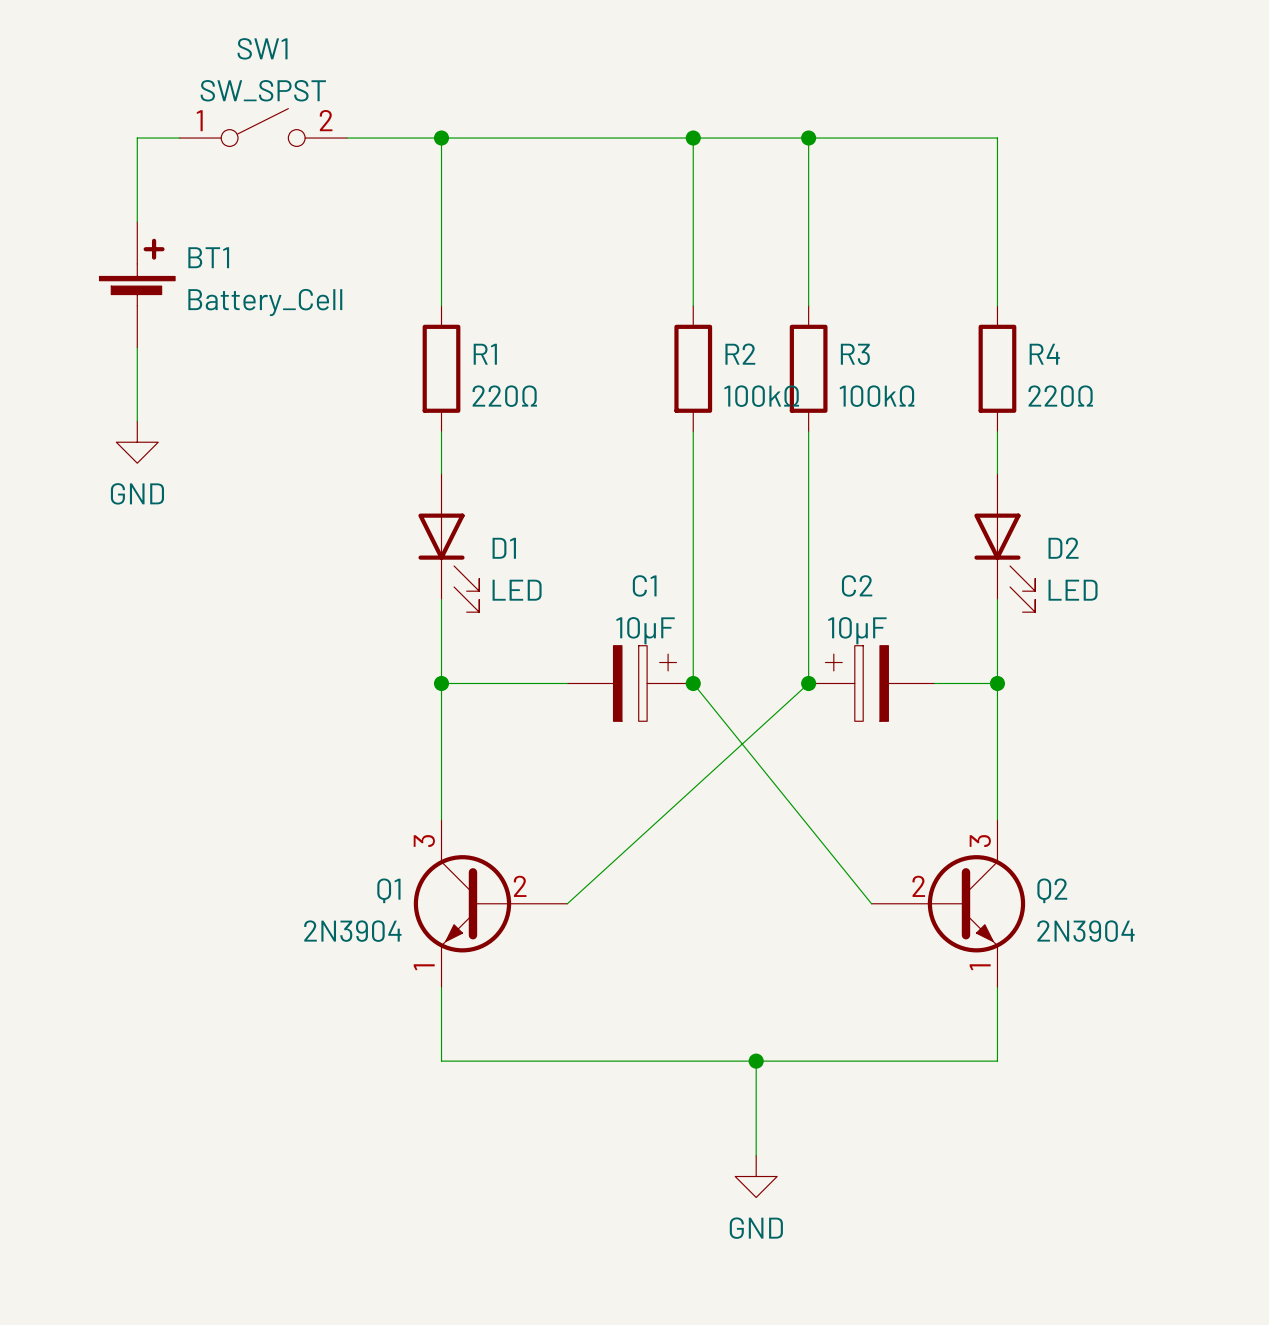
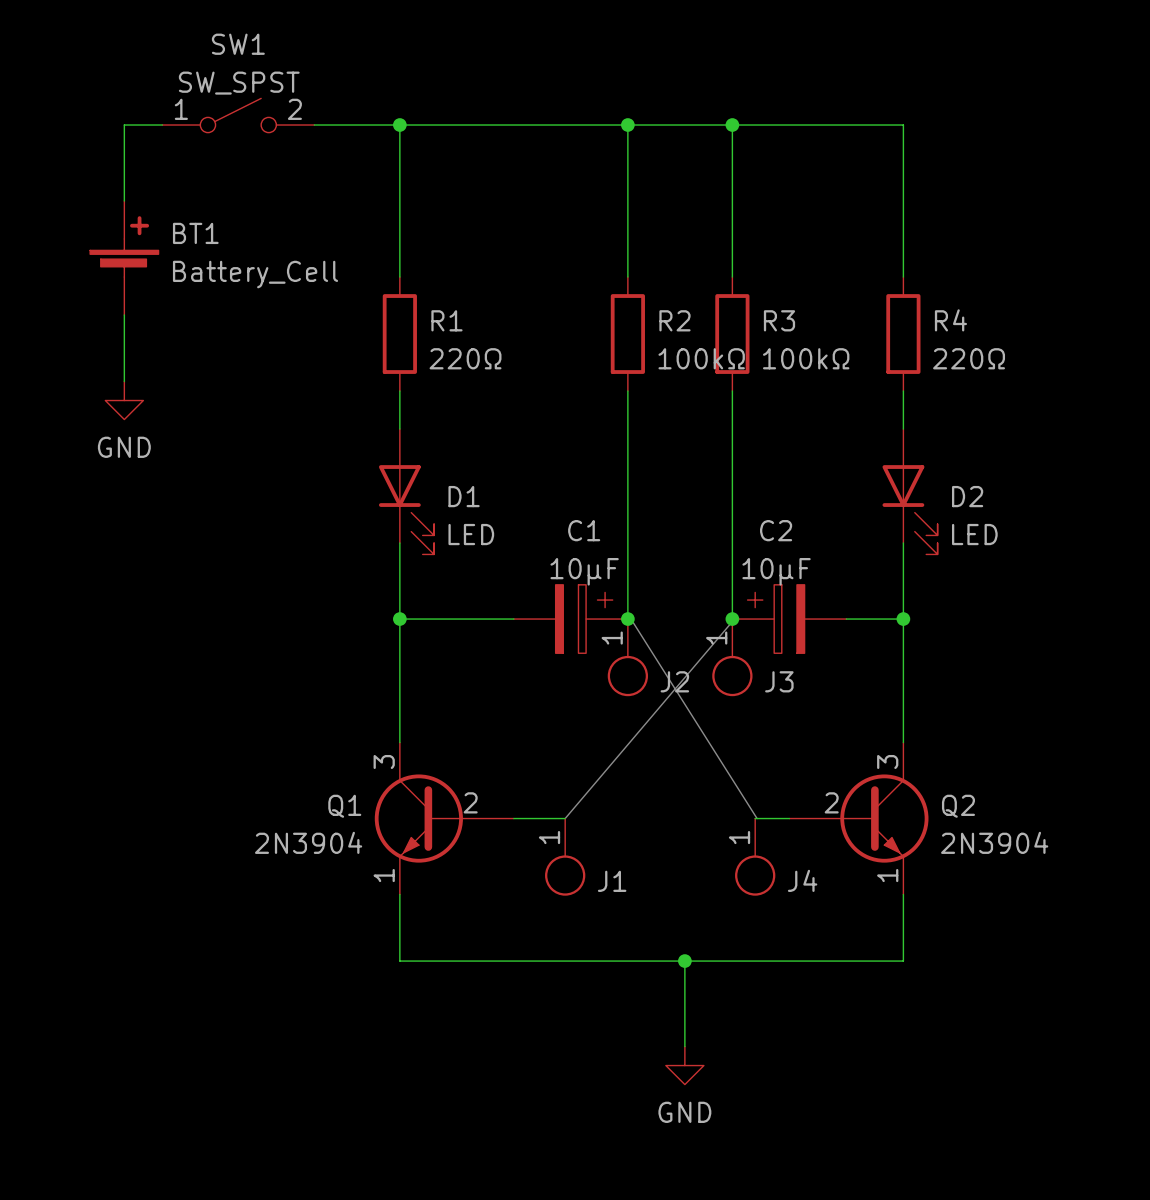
line: none -> (629, 617) (757, 818)
line: none -> (736, 617) (565, 818)
wire: (693, 683) (871, 903) -> (755, 818) (789, 818)
wire: (808, 683) (567, 903) -> (565, 818) (513, 818)
J2: none -> (627, 657)
J3: none -> (732, 657)
J1: none -> (565, 857)
J4: none -> (755, 857)

